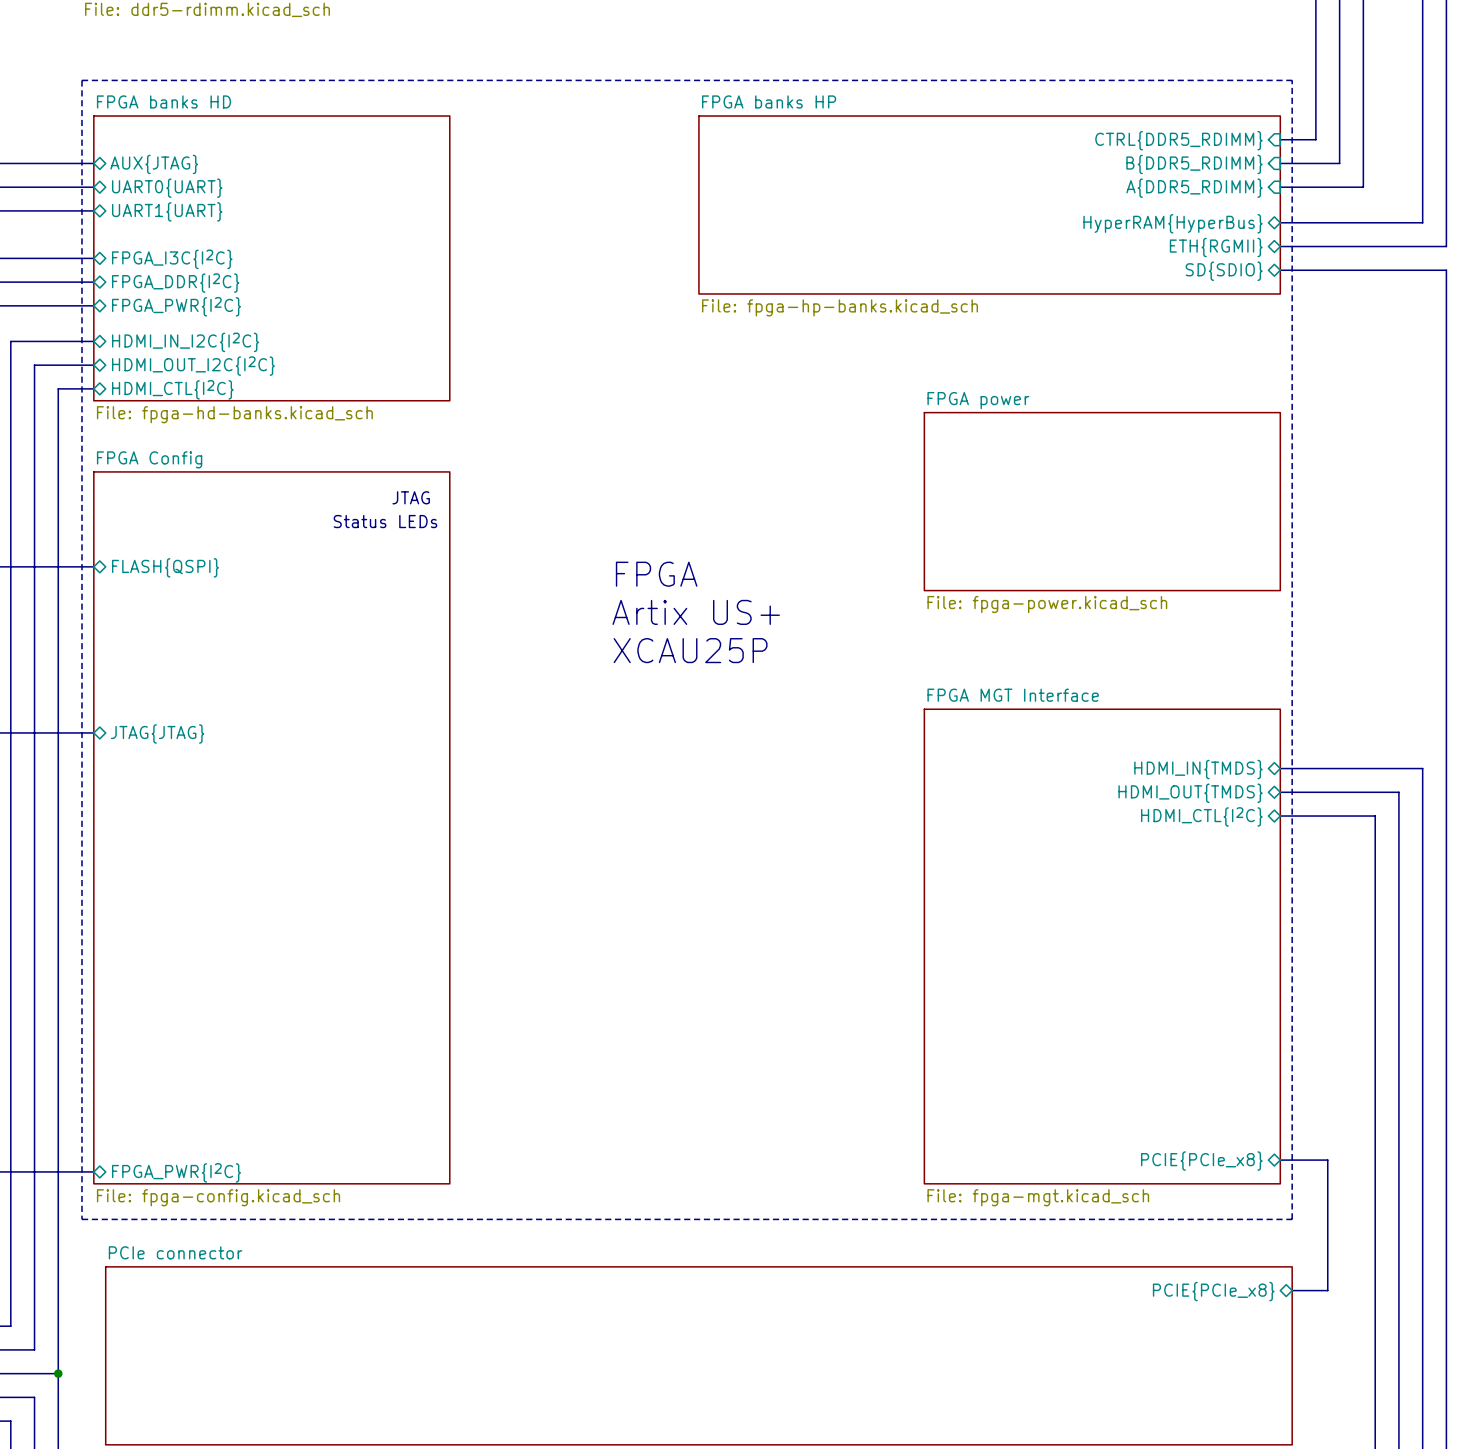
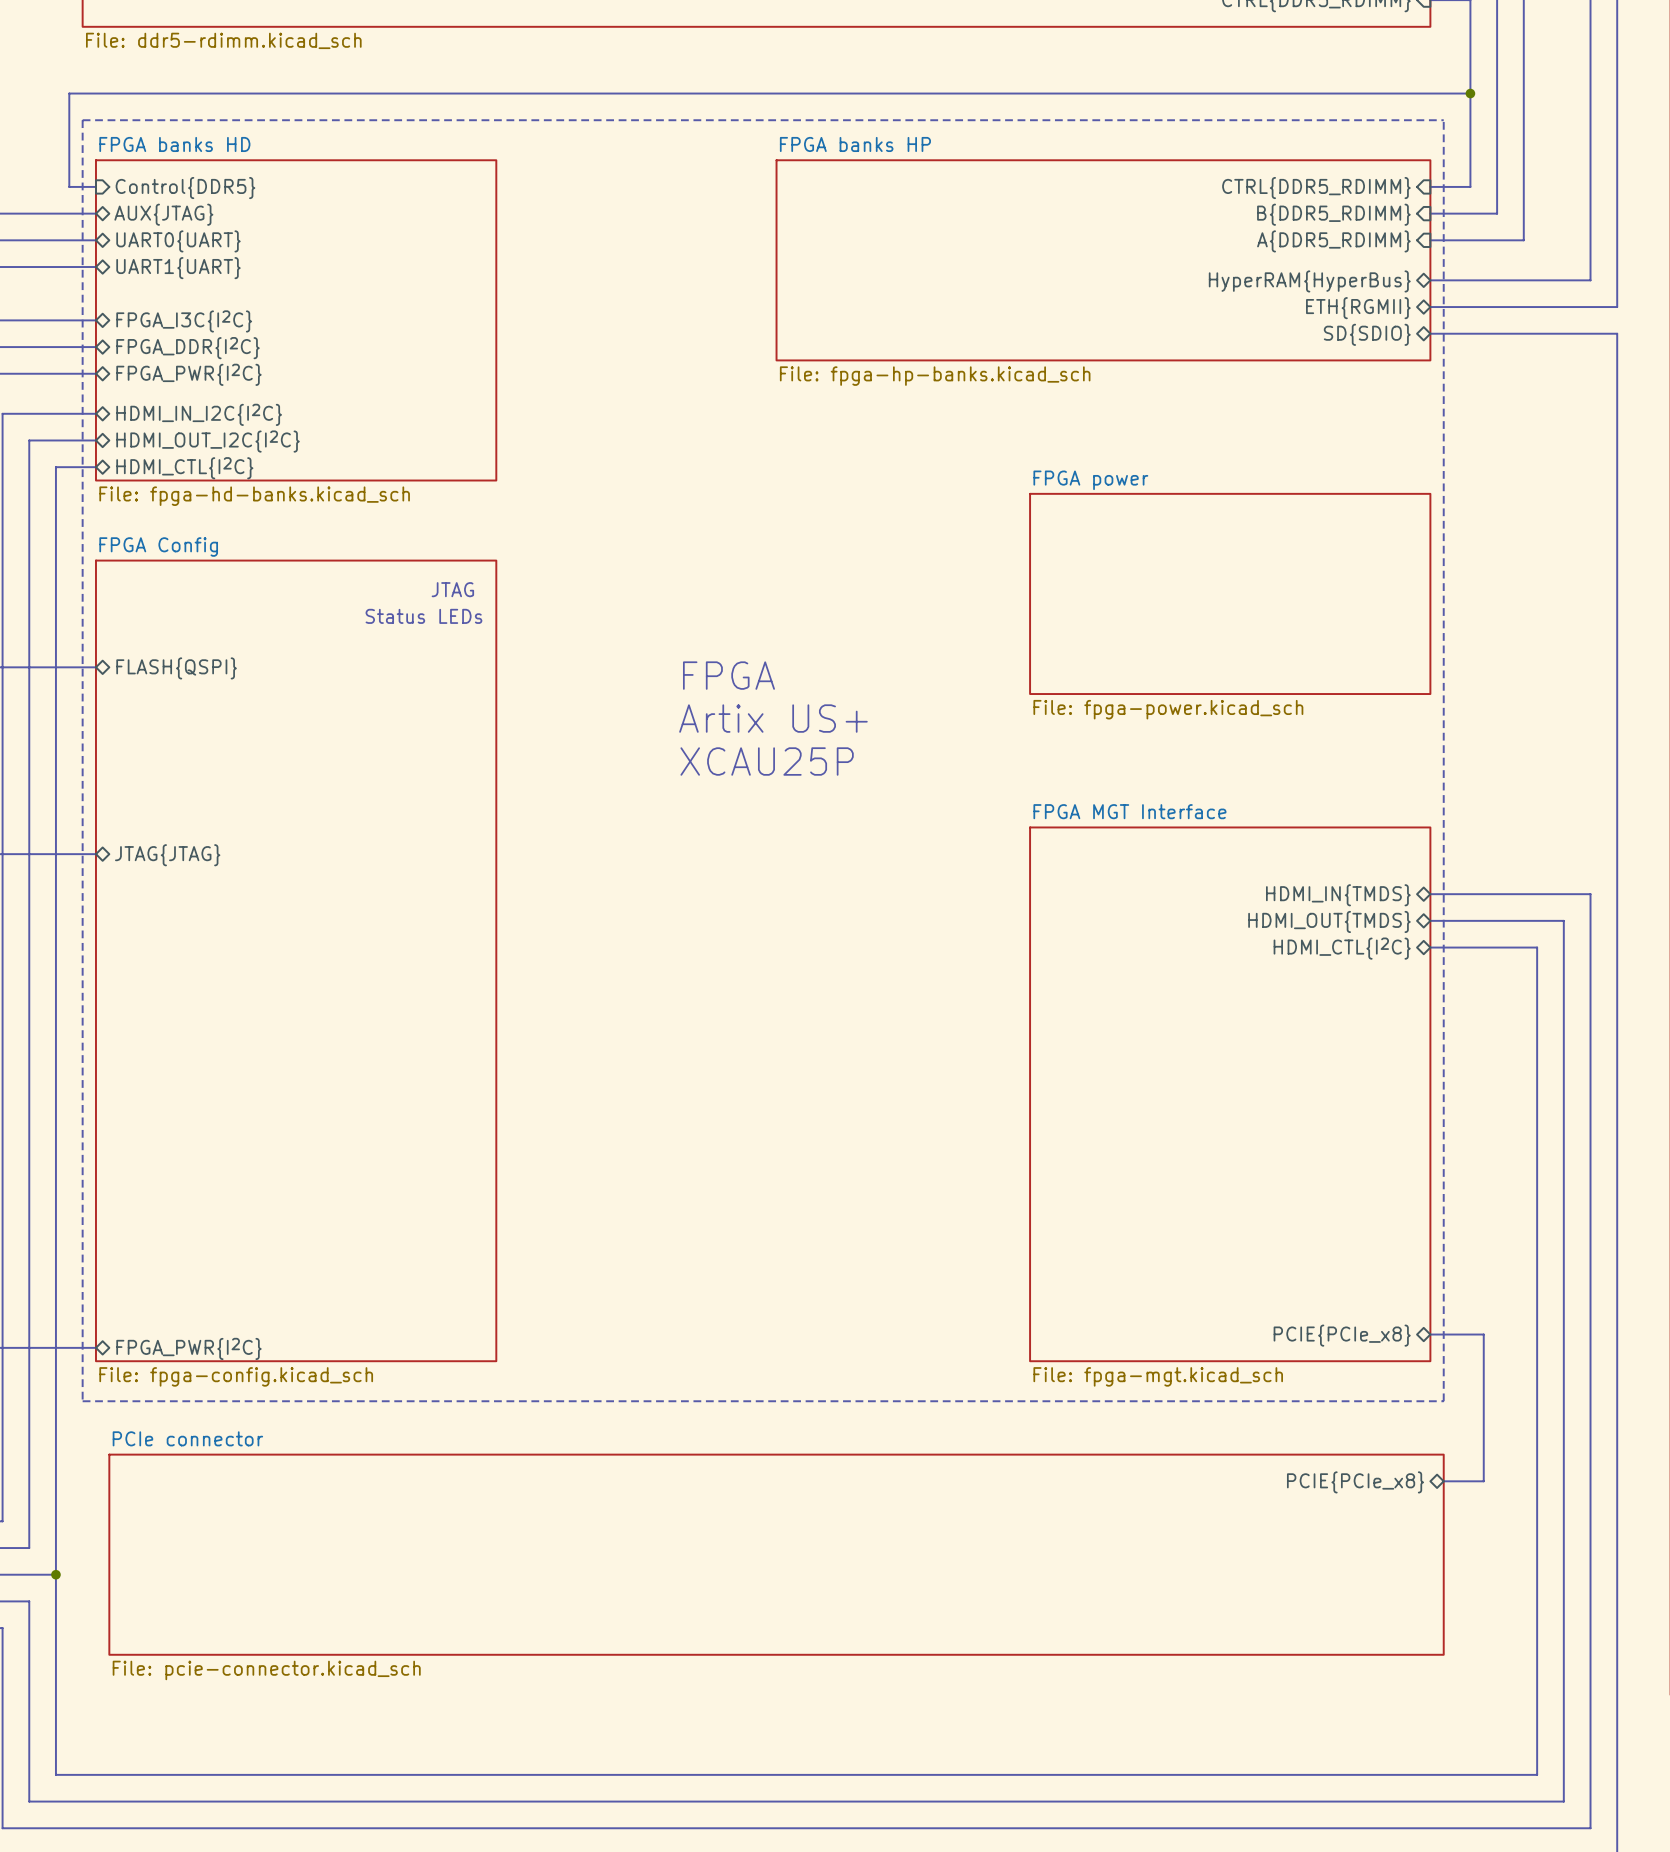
bus: none -> (1470, 93) (69, 93) (69, 186) (95, 186)
junction: none -> (1470, 93)
sheet pin: none -> Control{DDR5} (185, 188)

